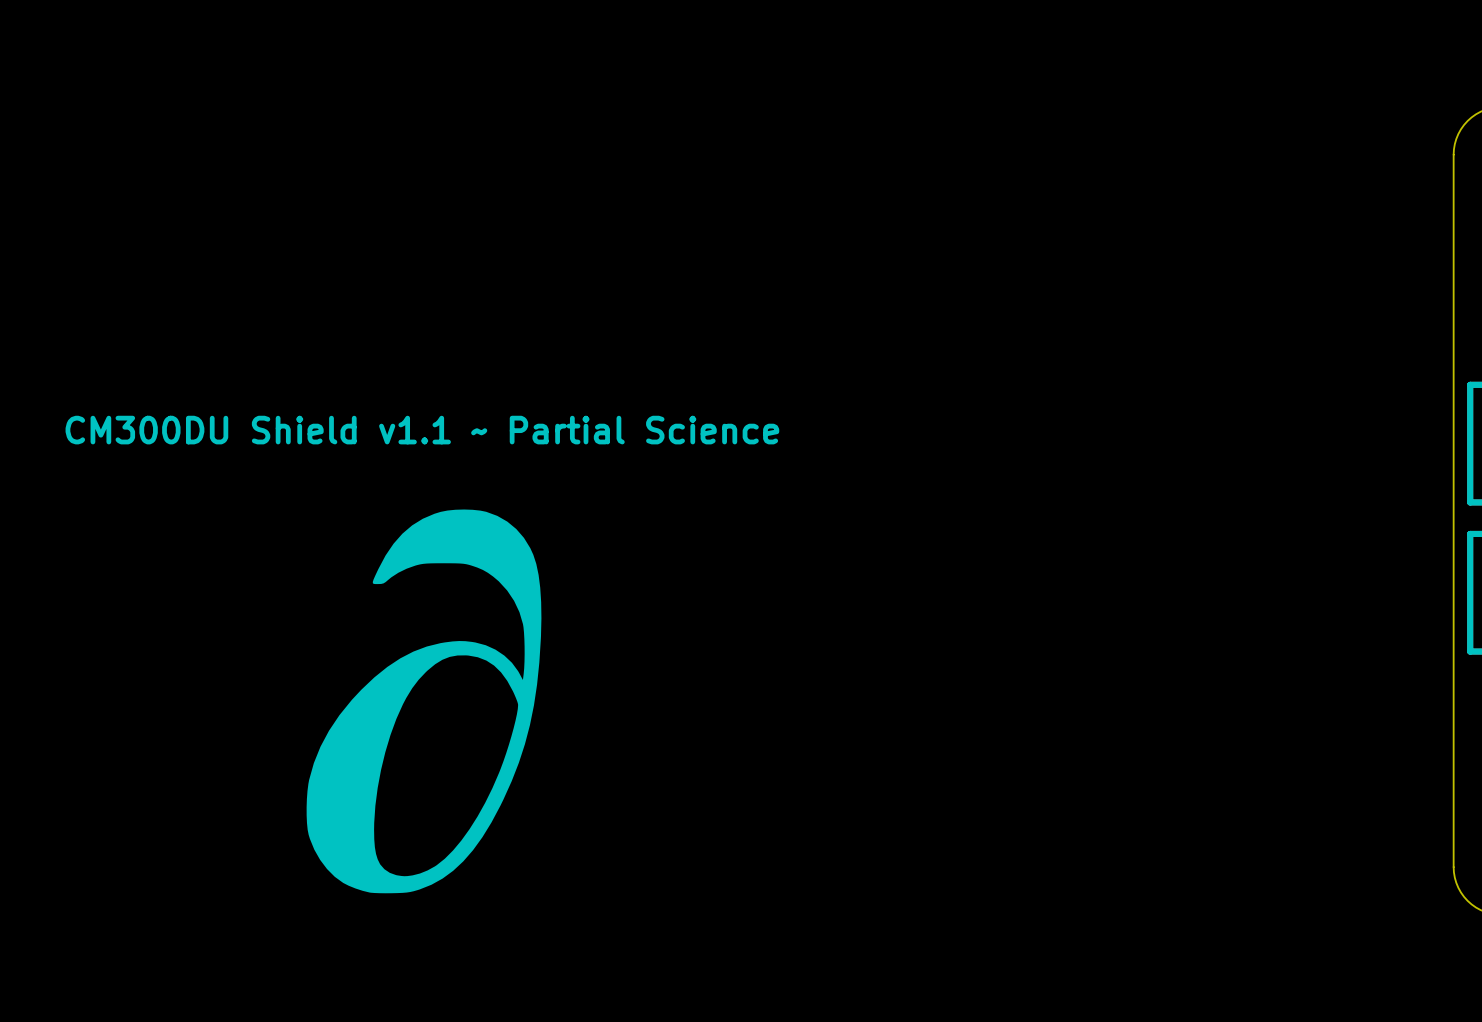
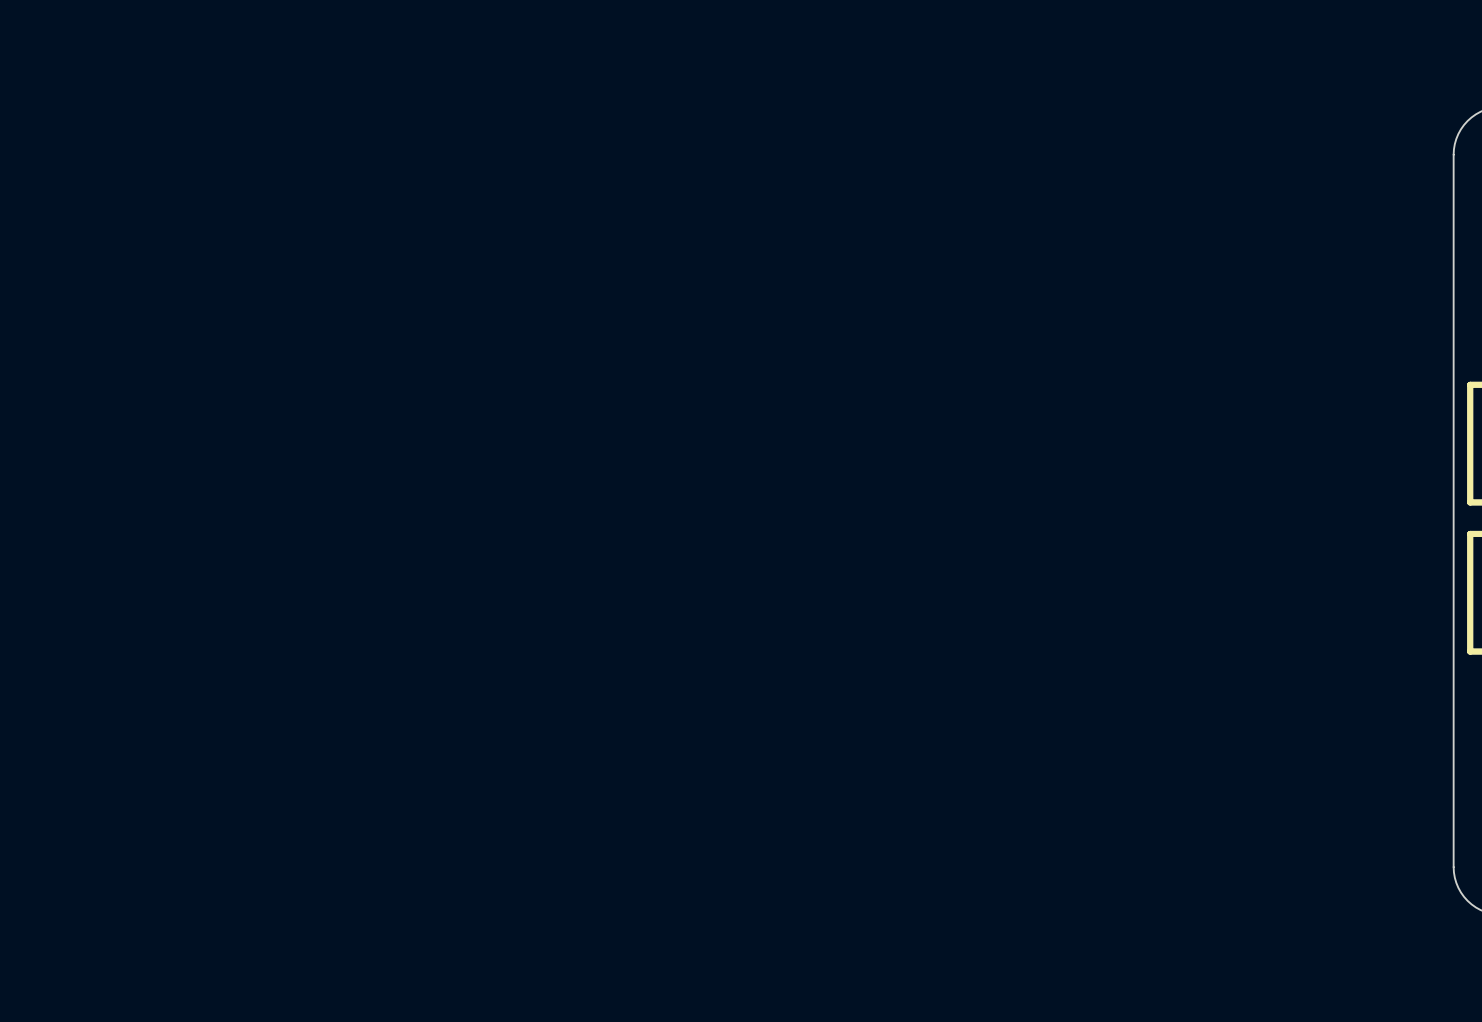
text: CM300DU Shield v1.1 ~ Partial Science (422, 430) -> none
drawing: [306, 509, 542, 894] -> none

